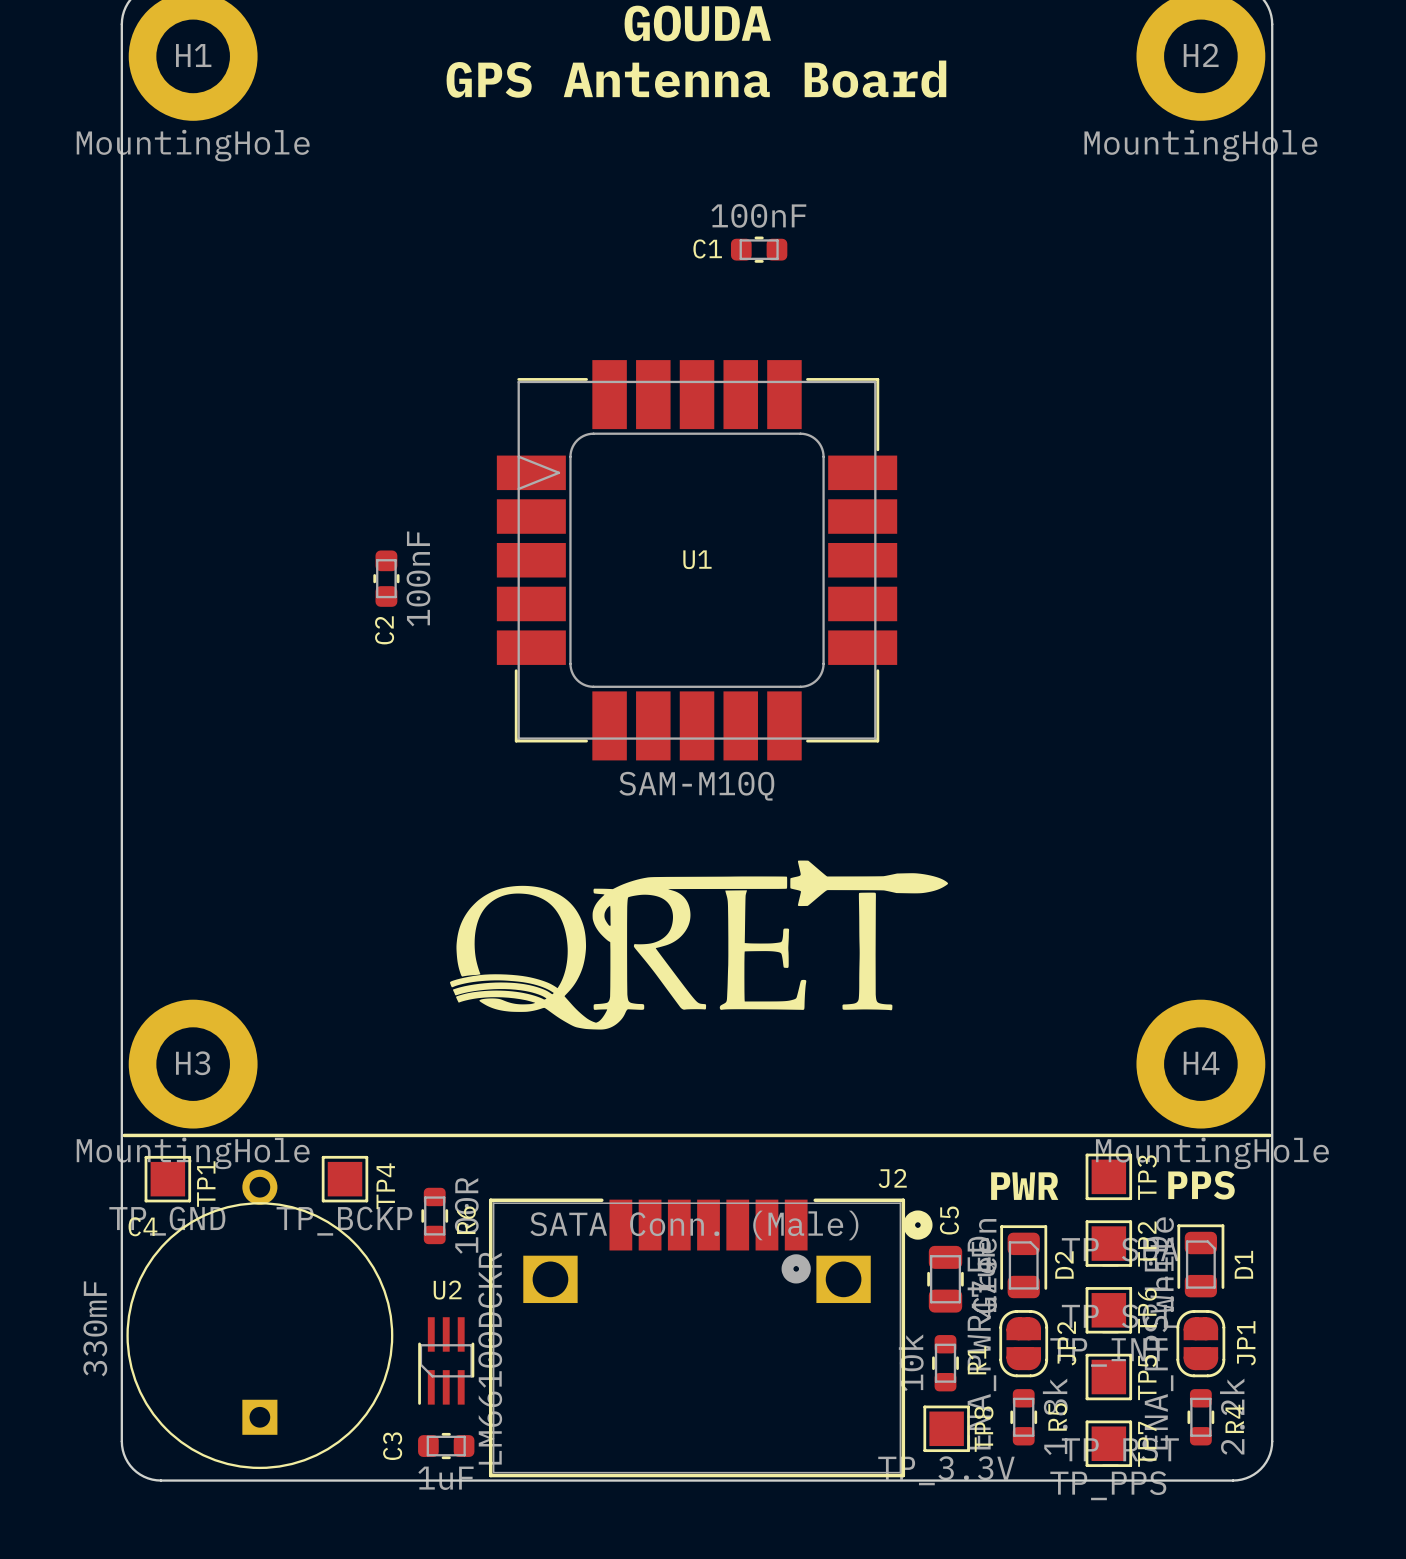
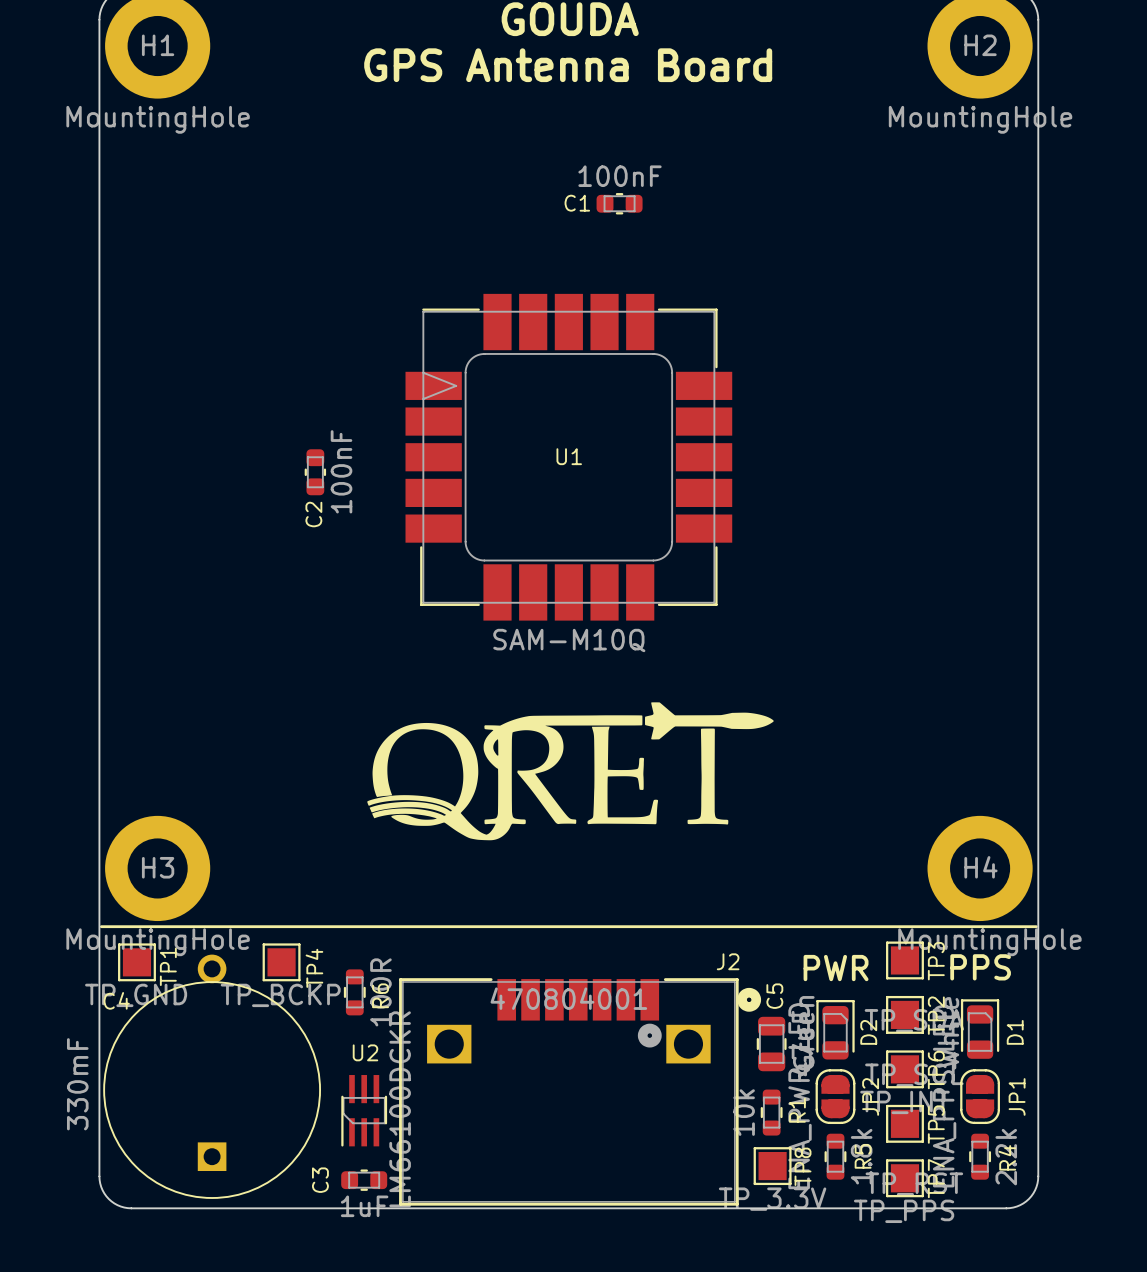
J2 value: SATA Conn. (Male) (694, 1225) -> 470804001 (568, 998)

